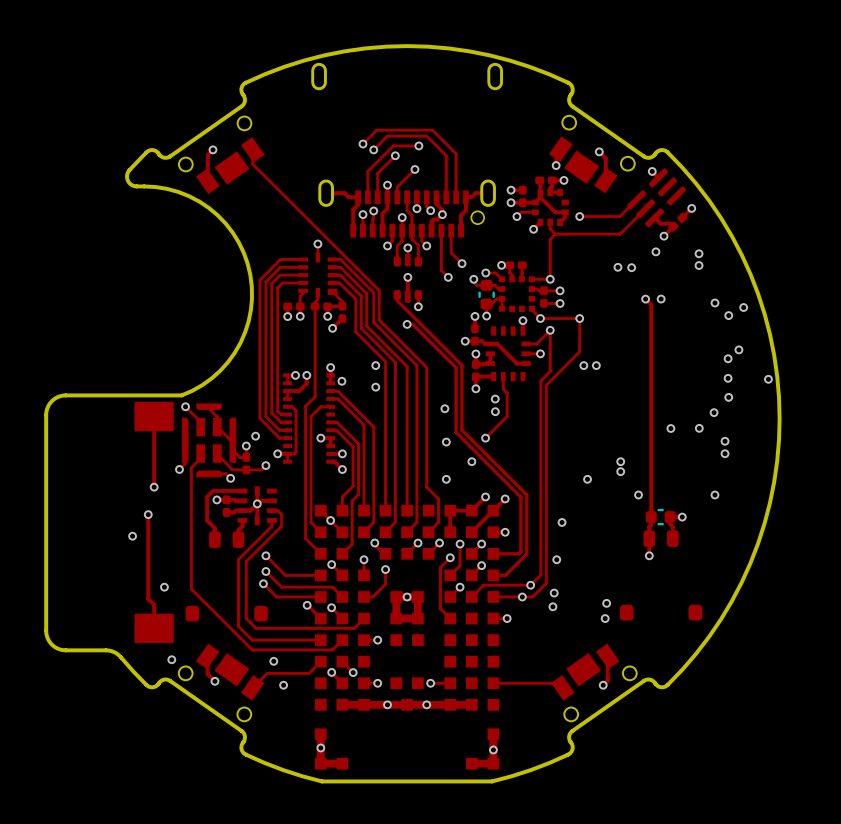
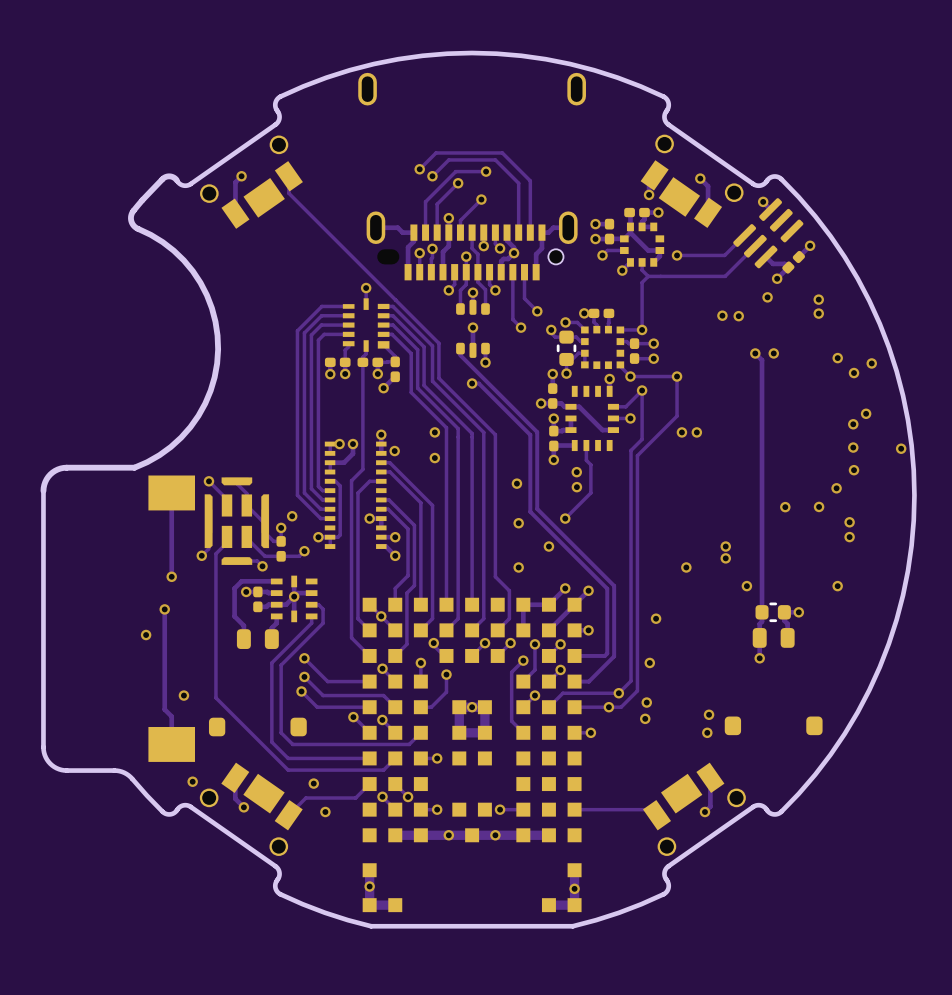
board edge: (158, 153) (152, 150) (146, 151) (128, 171) (127, 180) (134, 186) (167, 188) (189, 196) (208, 207) (232, 232) (247, 263) (251, 286) (250, 309) (245, 332) (234, 352) (220, 370) (202, 385) (181, 395) (63, 395) (51, 401) (46, 415) -> (176, 180) (169, 176) (163, 178) (133, 210) (131, 219) (135, 227) (162, 242) (183, 260) (200, 282) (206, 295) (215, 321) (218, 349) (214, 377) (205, 403) (198, 415) (181, 437) (170, 447) (147, 462) (134, 467) (60, 468) (48, 476) (43, 490)

